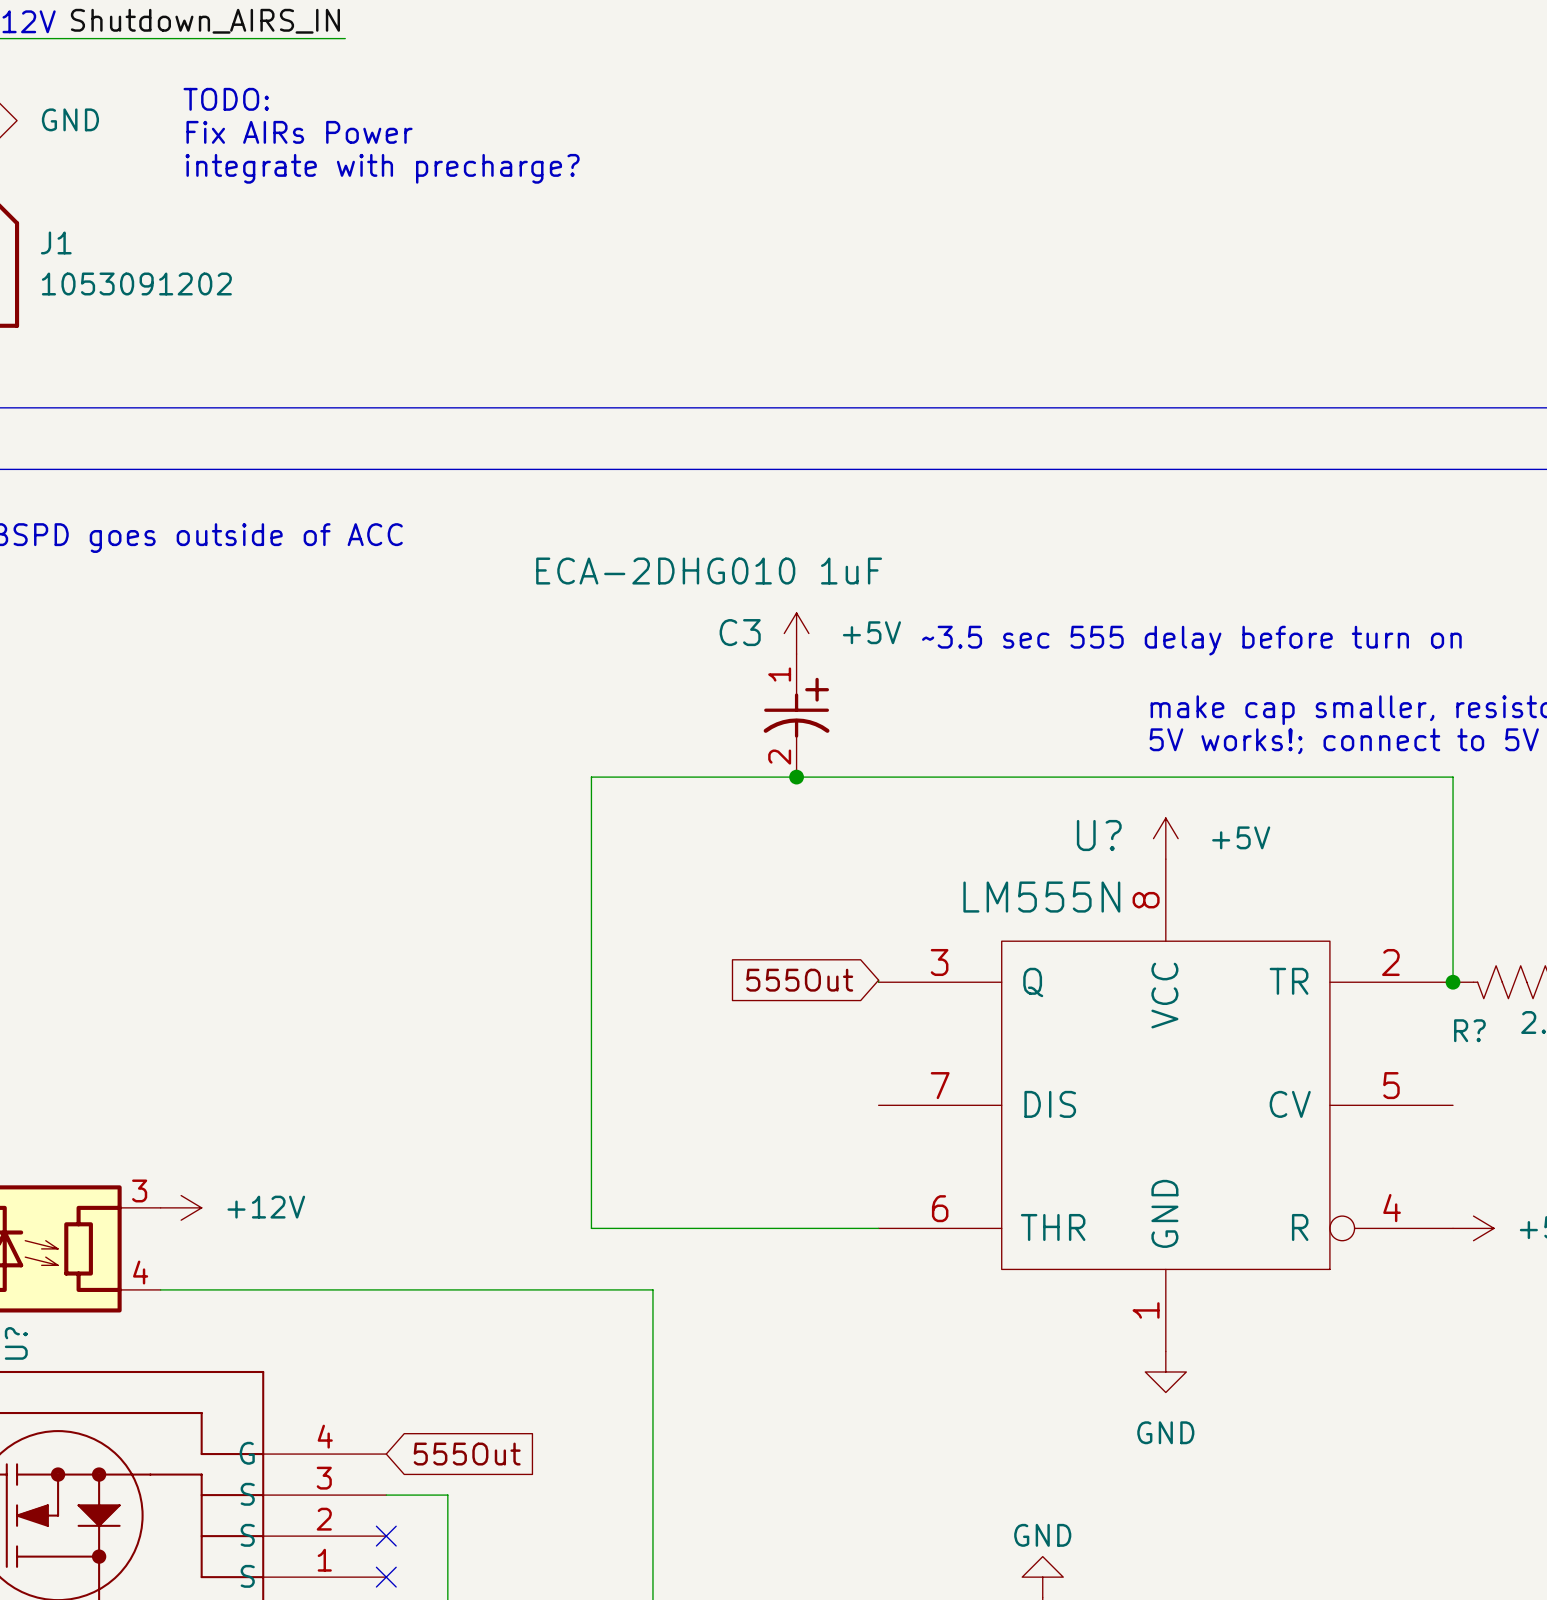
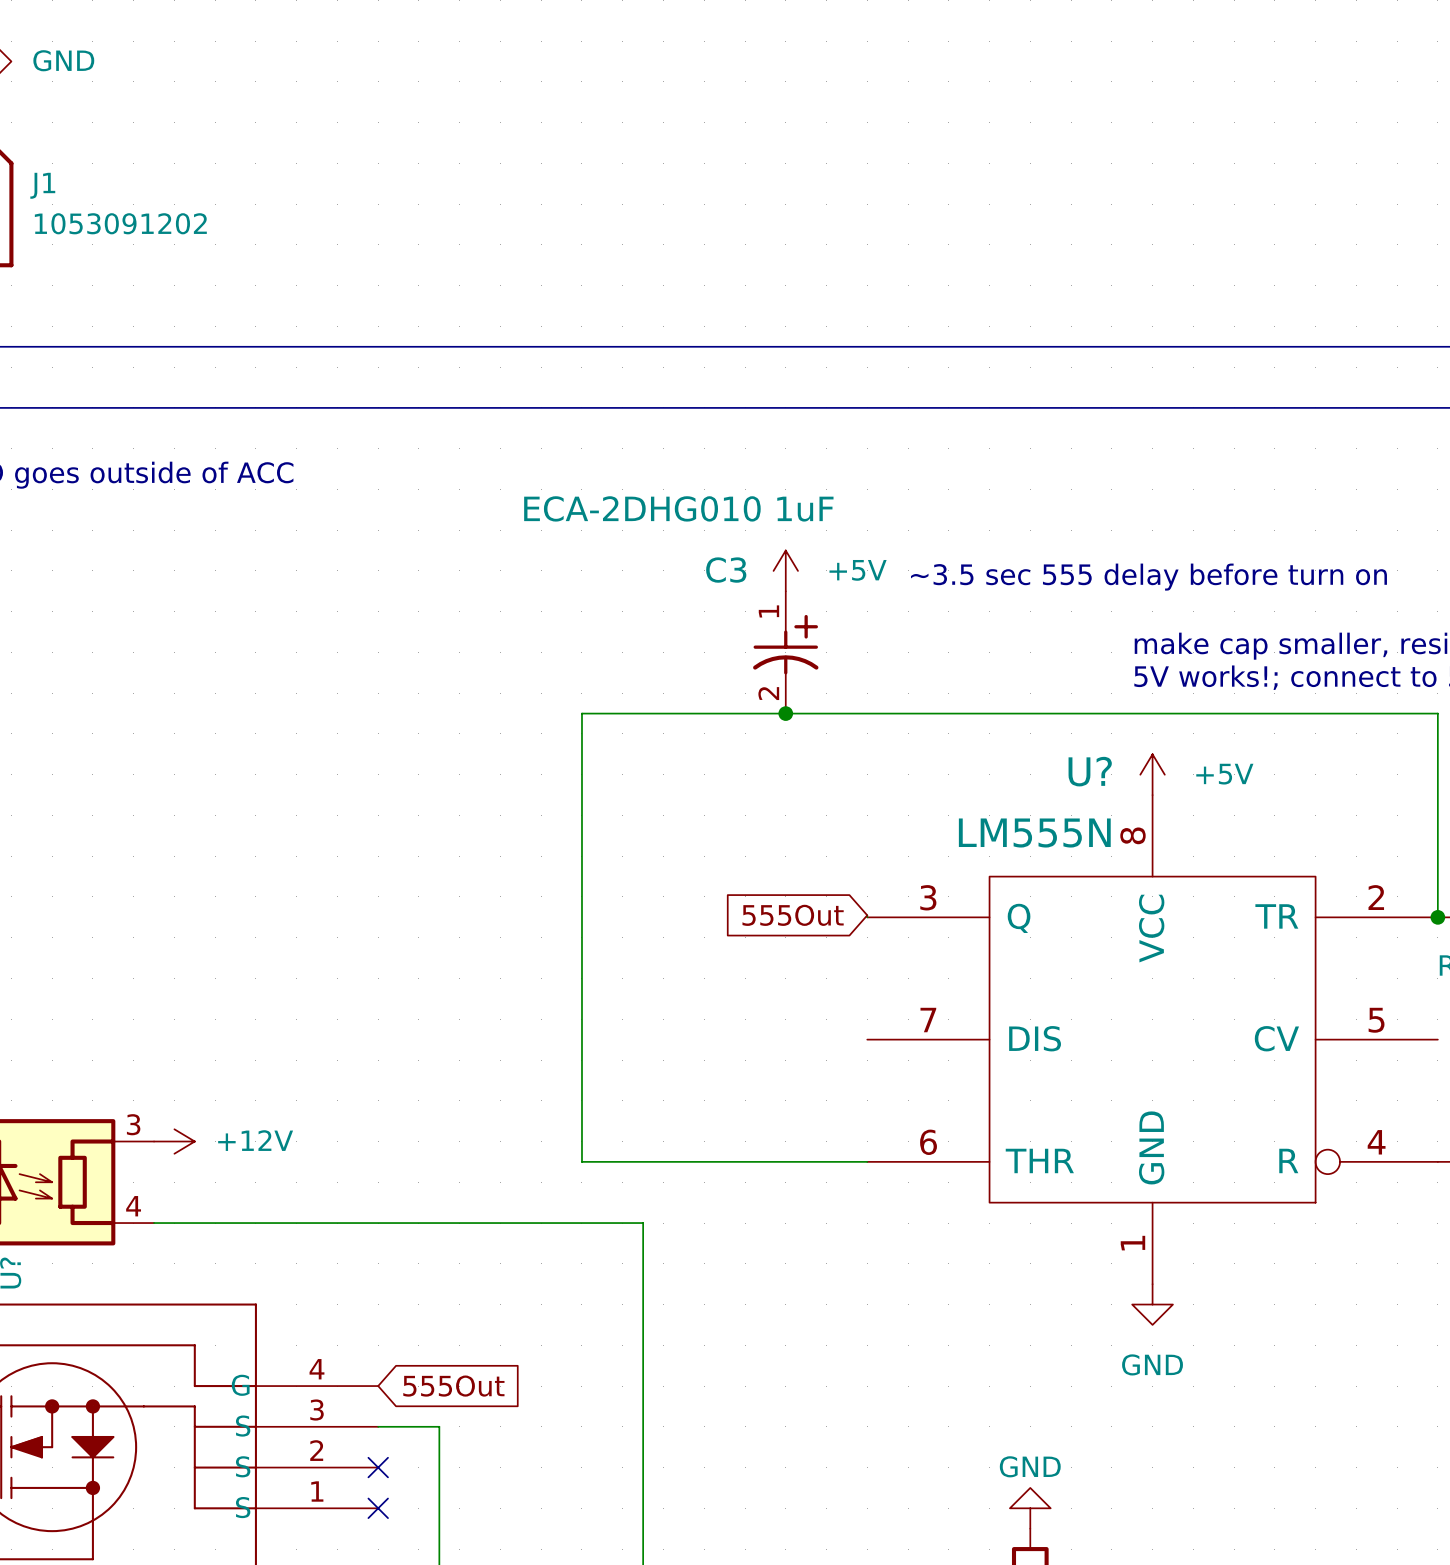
text: TODO: (226, 99) -> none
text: Fix AIRs Power (299, 132) -> none
text: integrate with precharge? (382, 168) -> none

